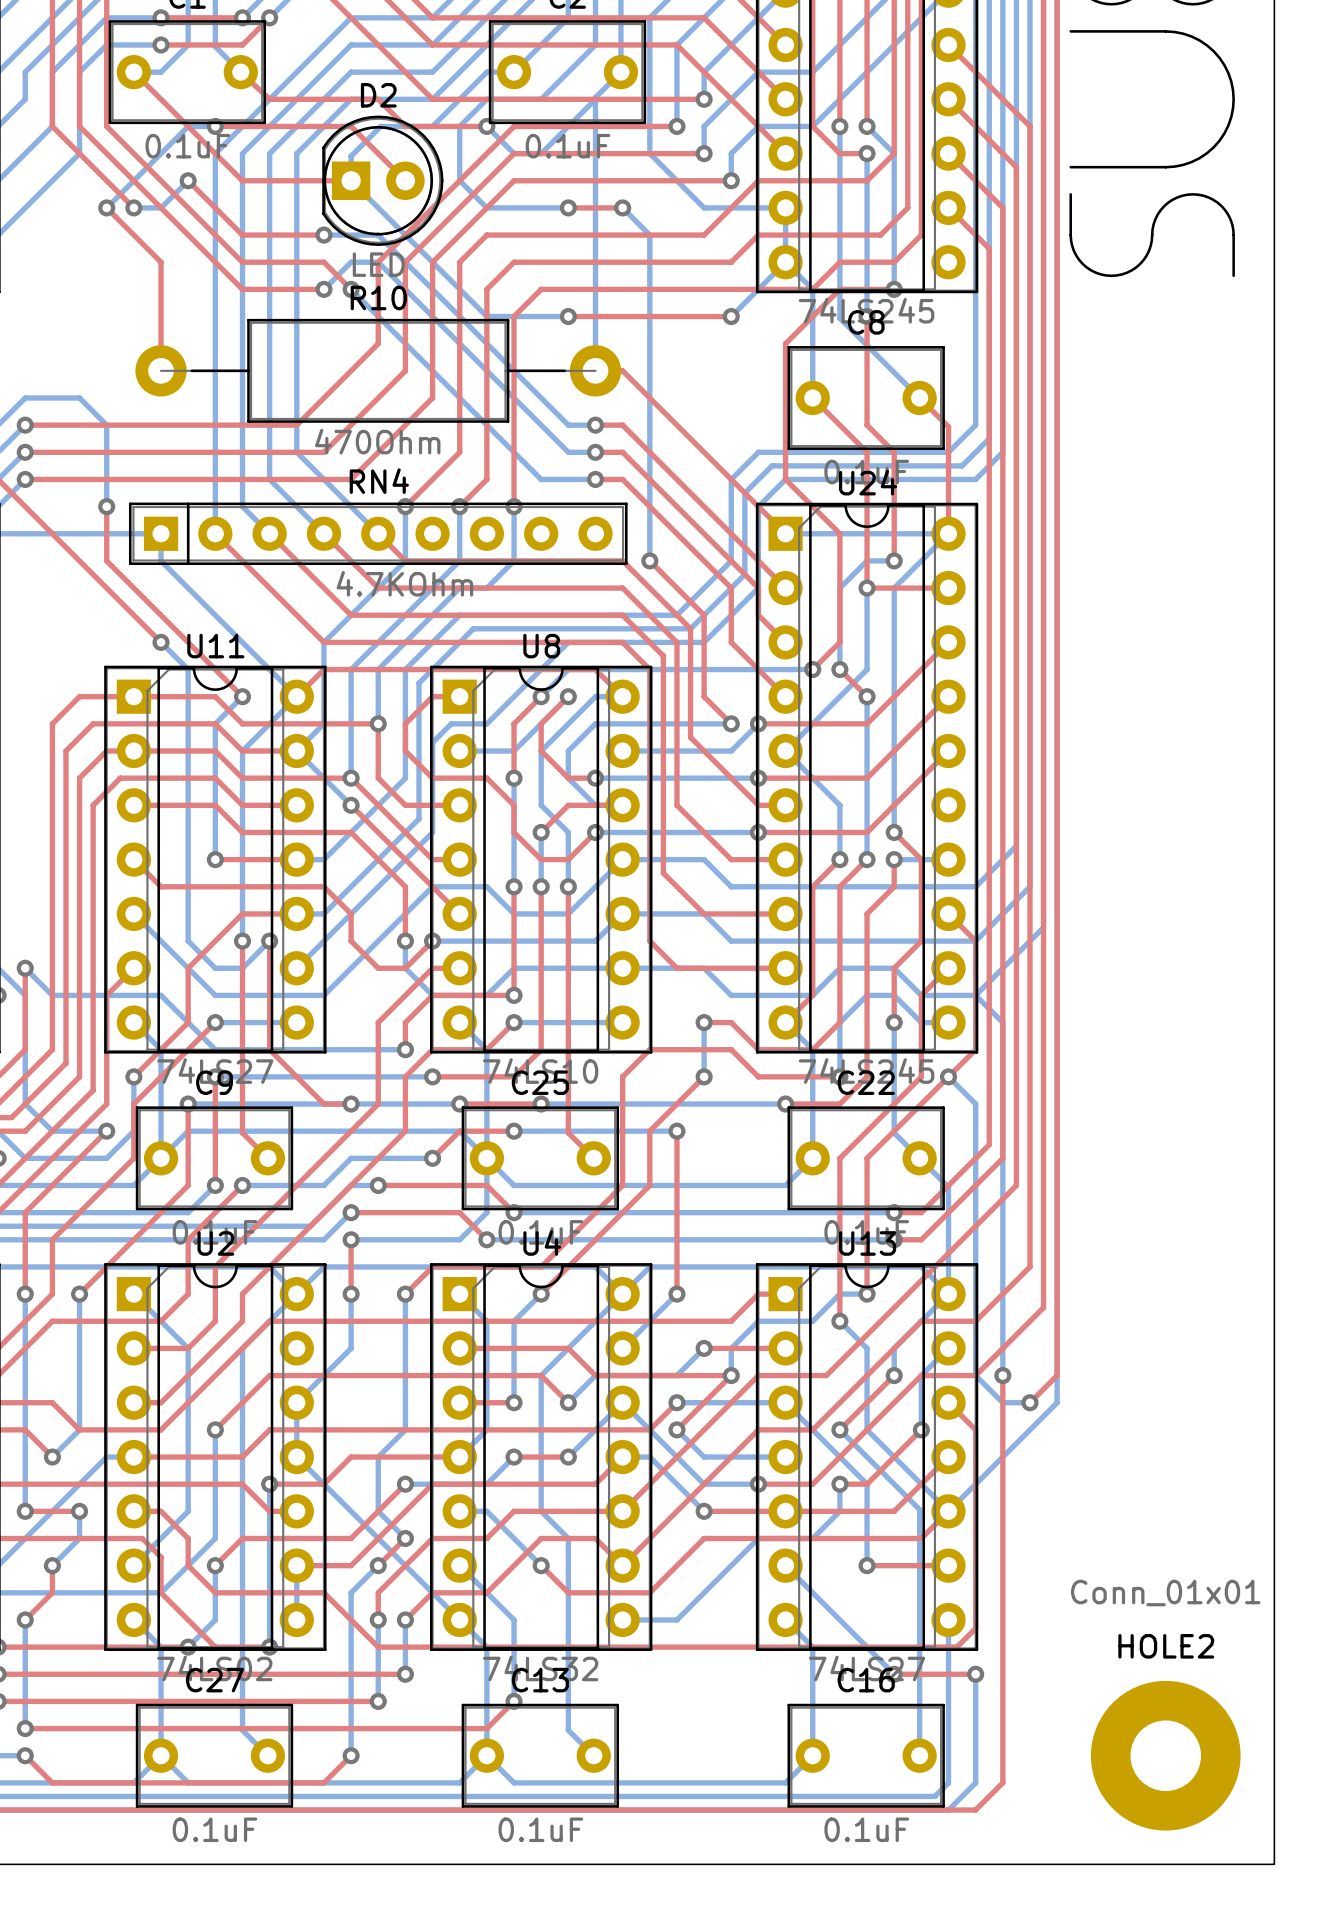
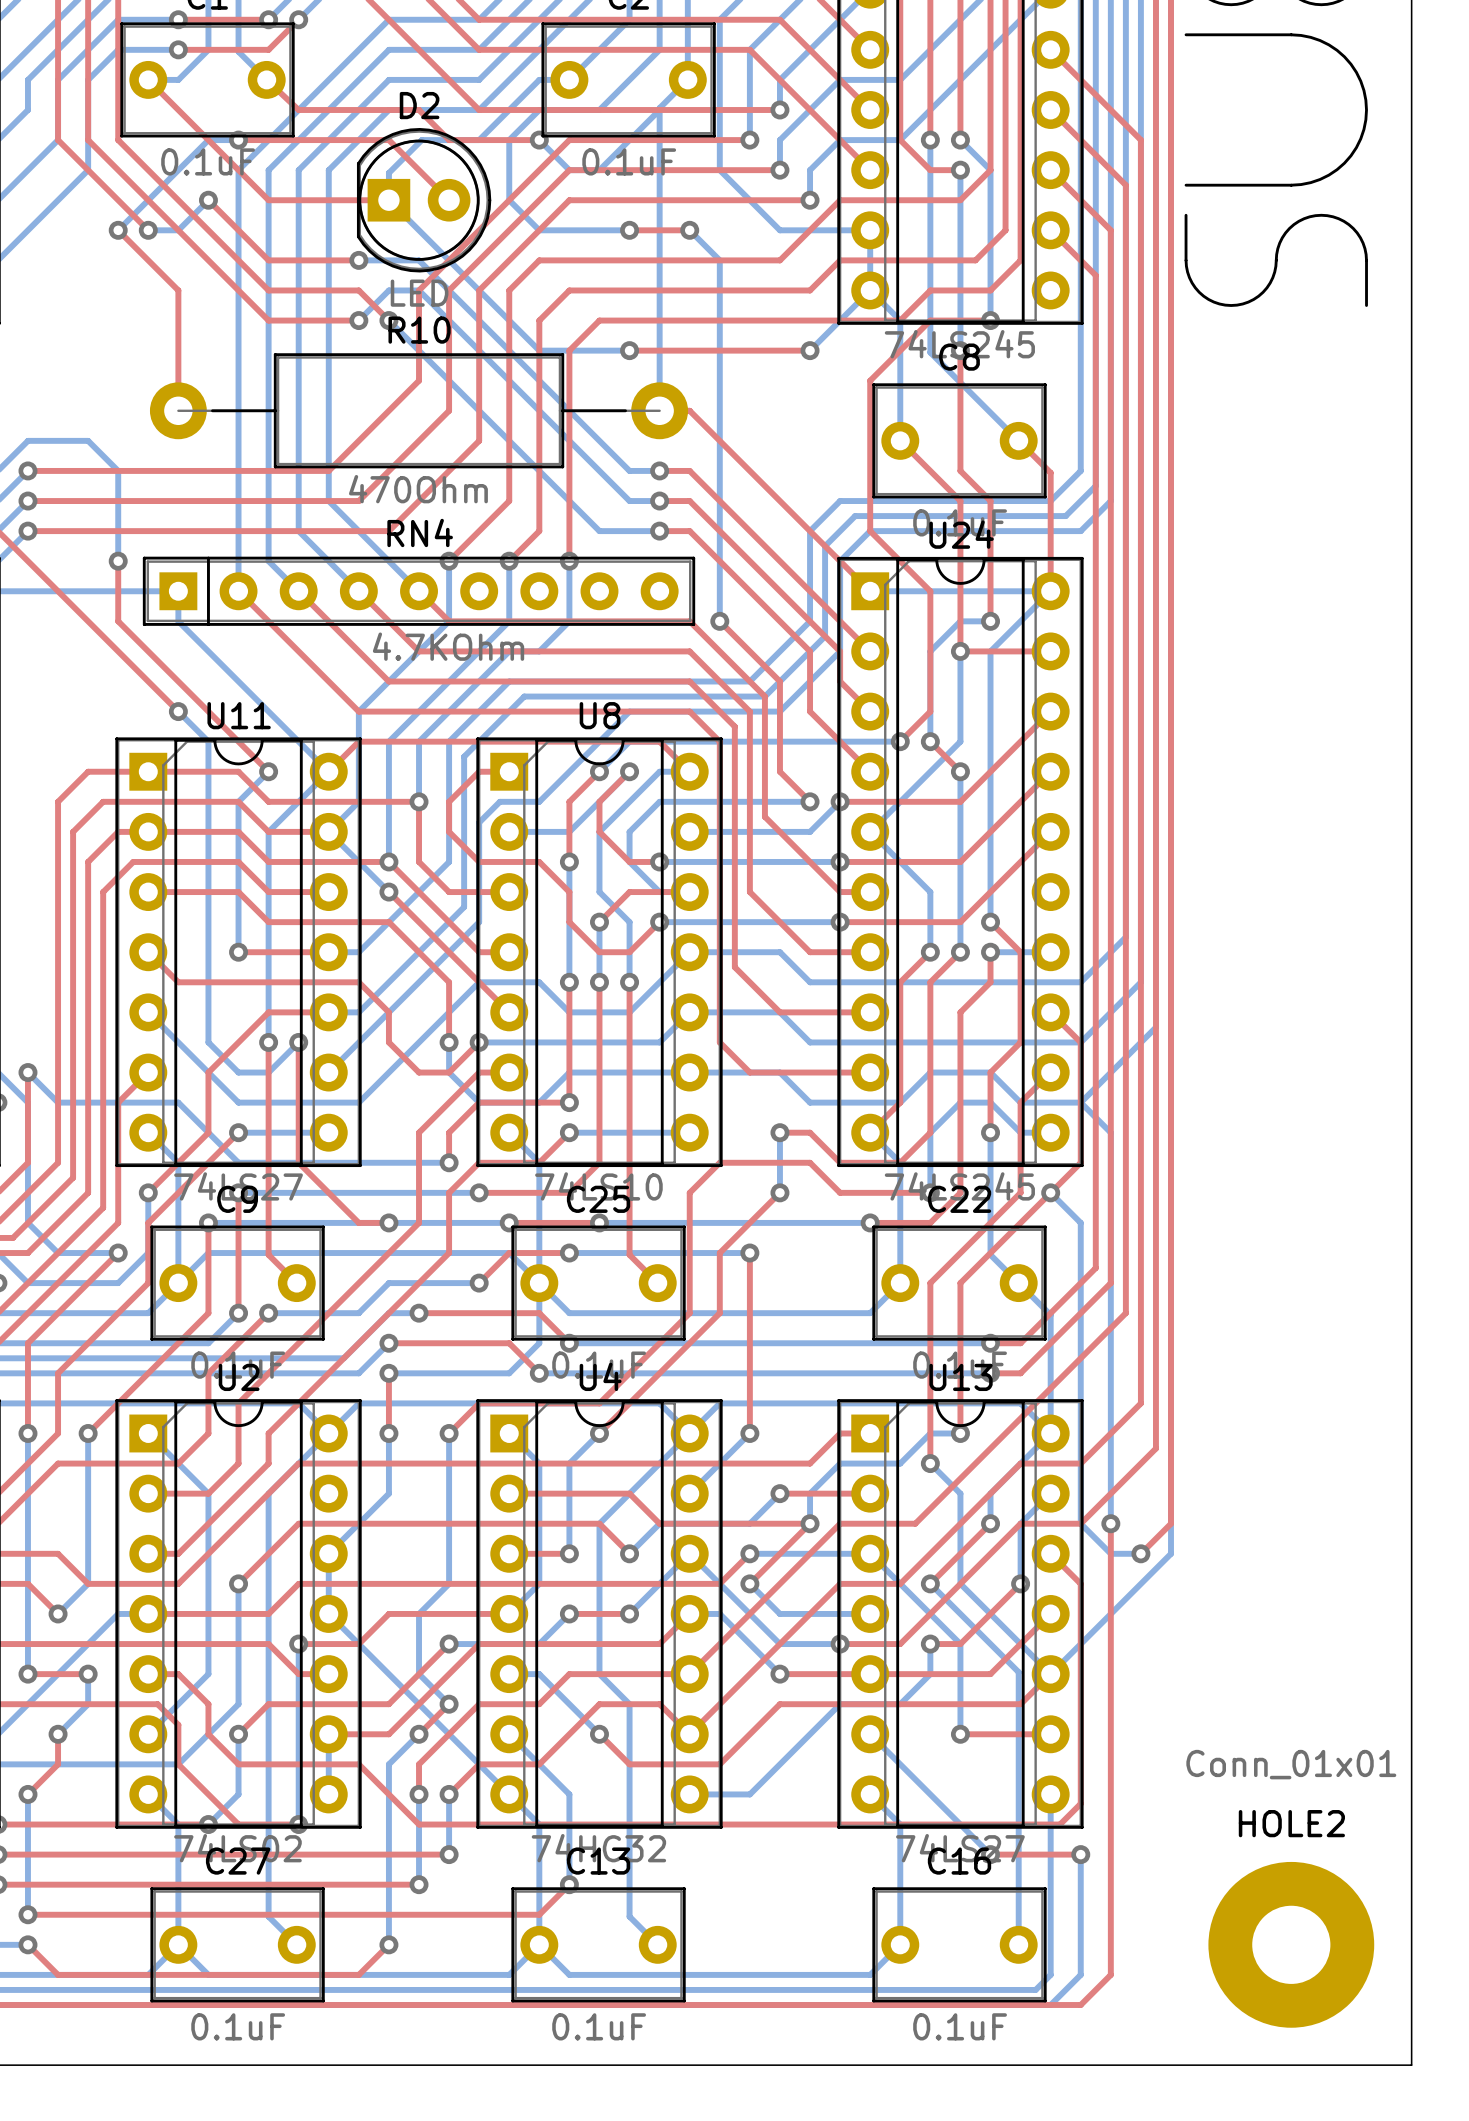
U4 value: 74LS32 (540, 1668) -> 74HC32 (598, 1848)

